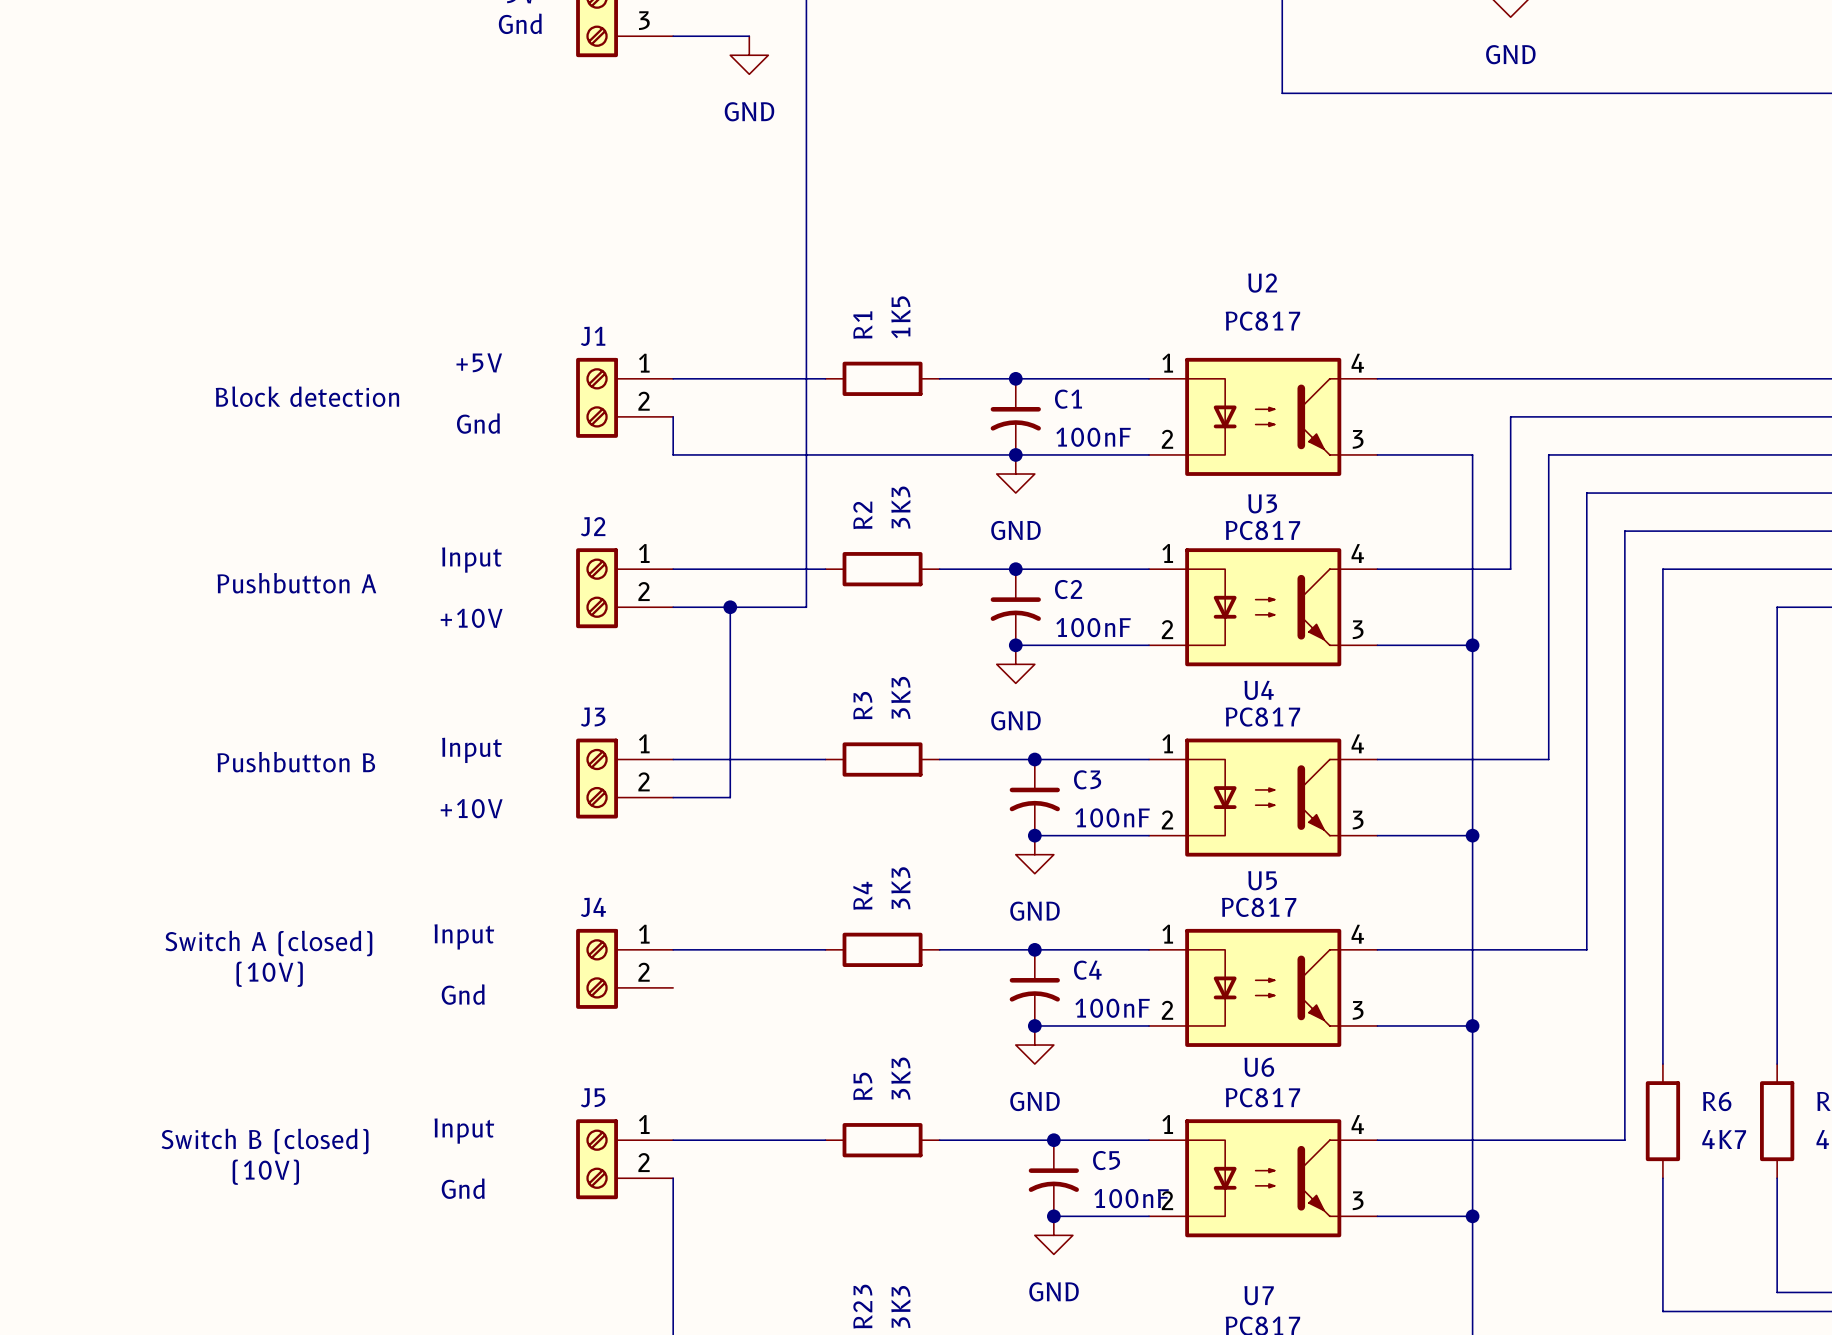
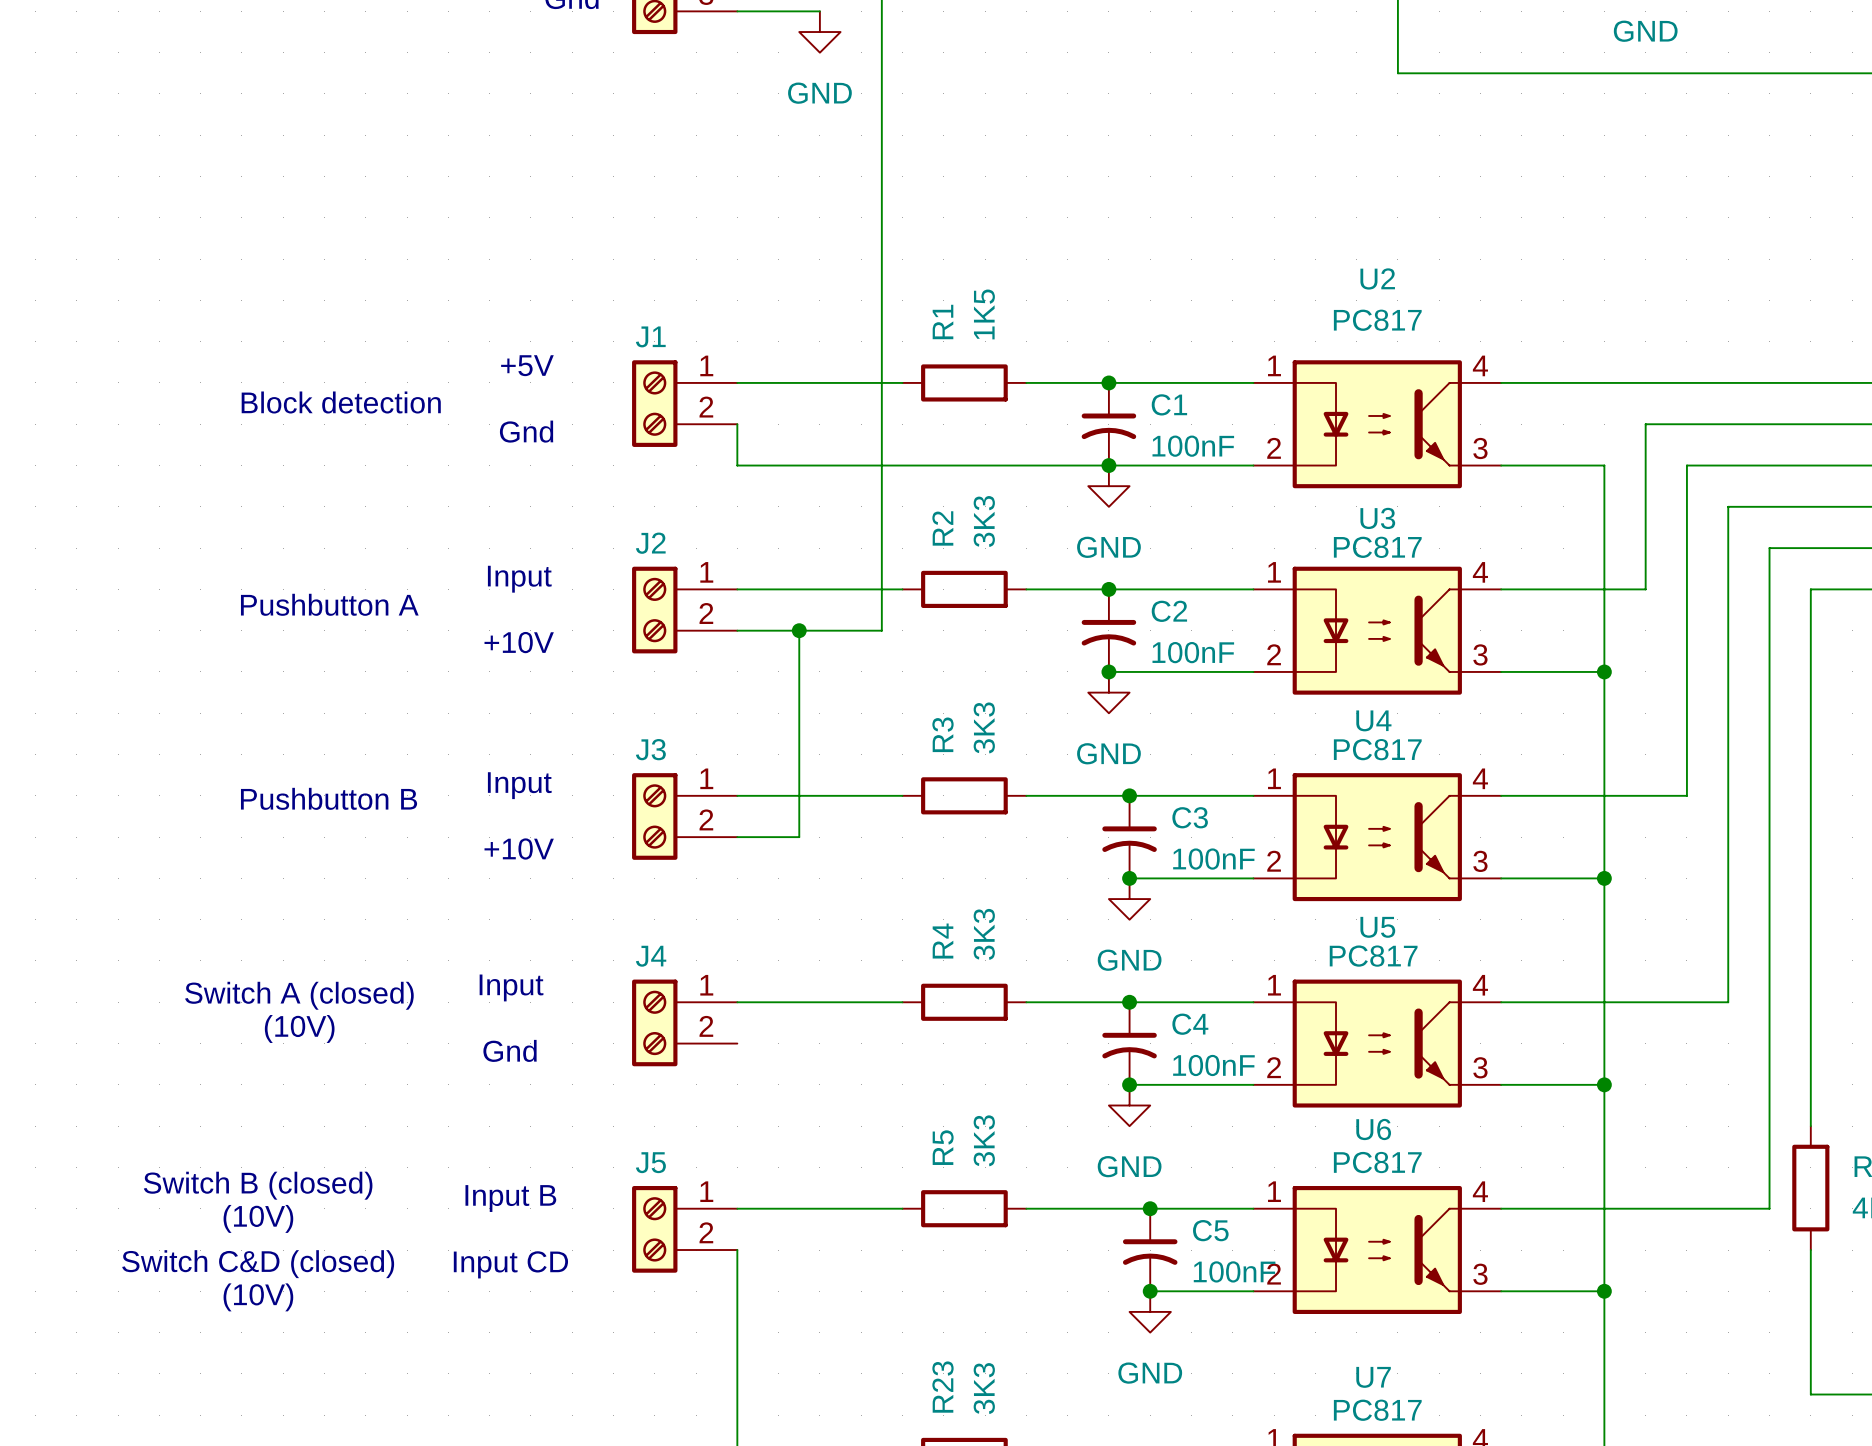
text: Input (464, 1131) -> Input B (510, 1198)
text position: Switch B (closed) (265, 1141) -> Switch B (closed) (258, 1185)
text position: (10V) (265, 1172) -> (10V) (258, 1218)
text: Gnd (463, 1188) -> Input CD (510, 1264)
text: none -> Switch C&D (closed) (258, 1264)
text: none -> (10V) (258, 1297)

